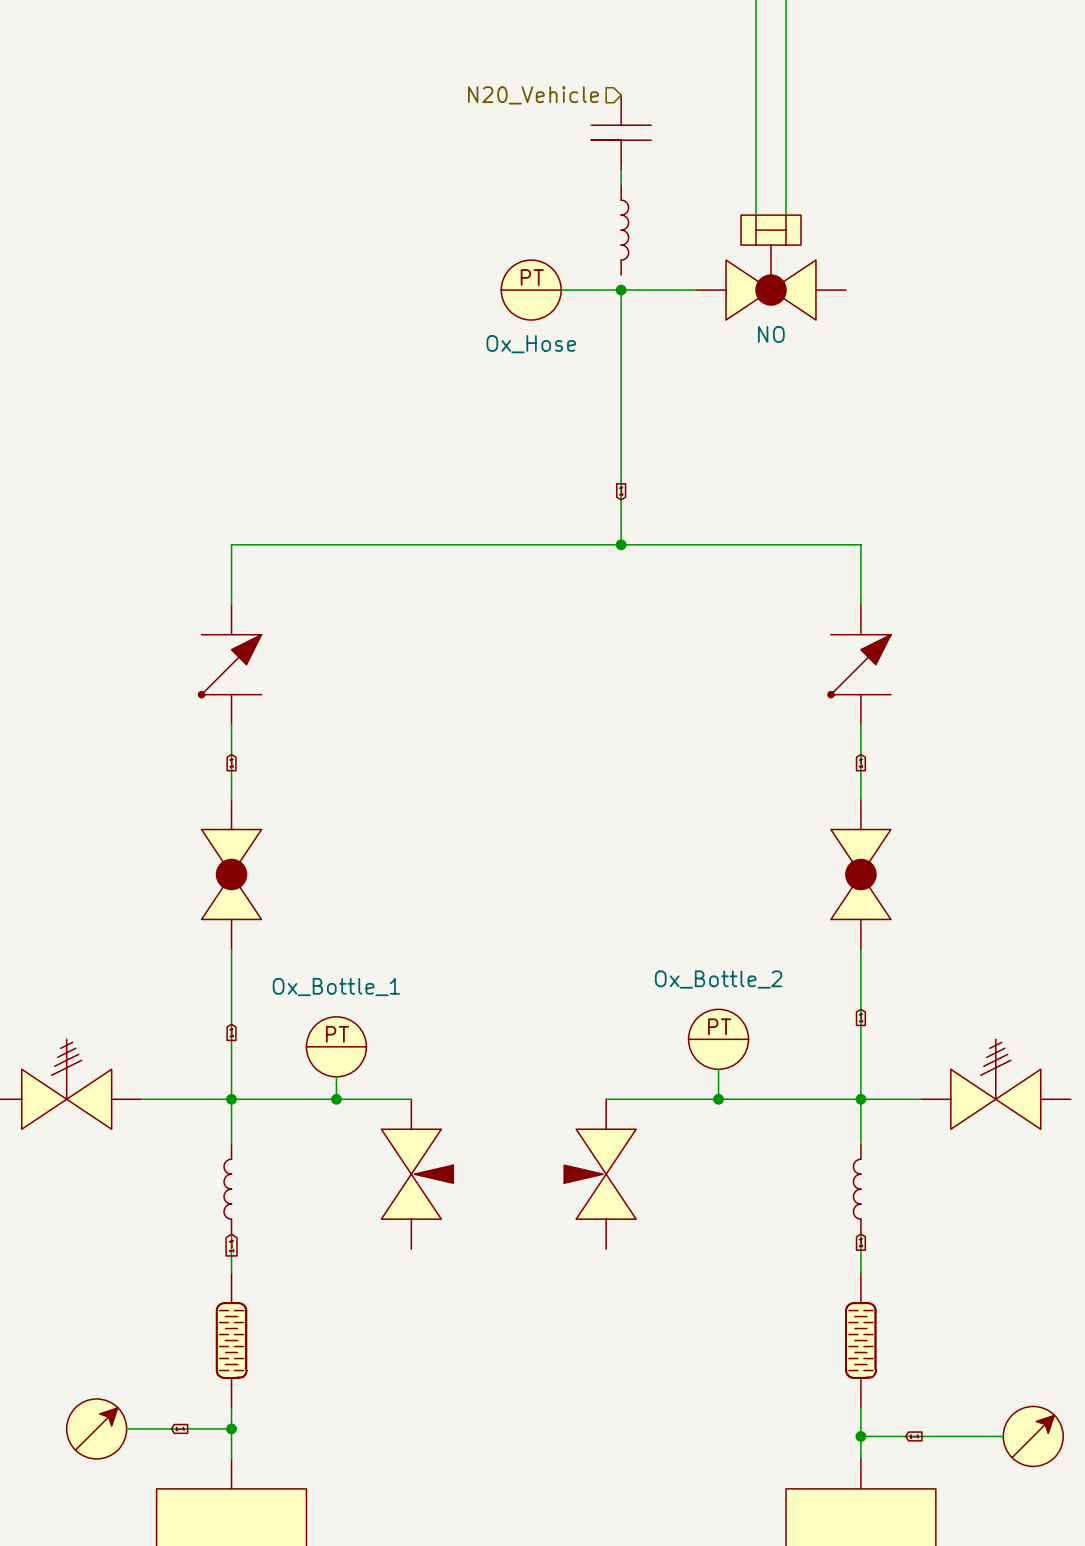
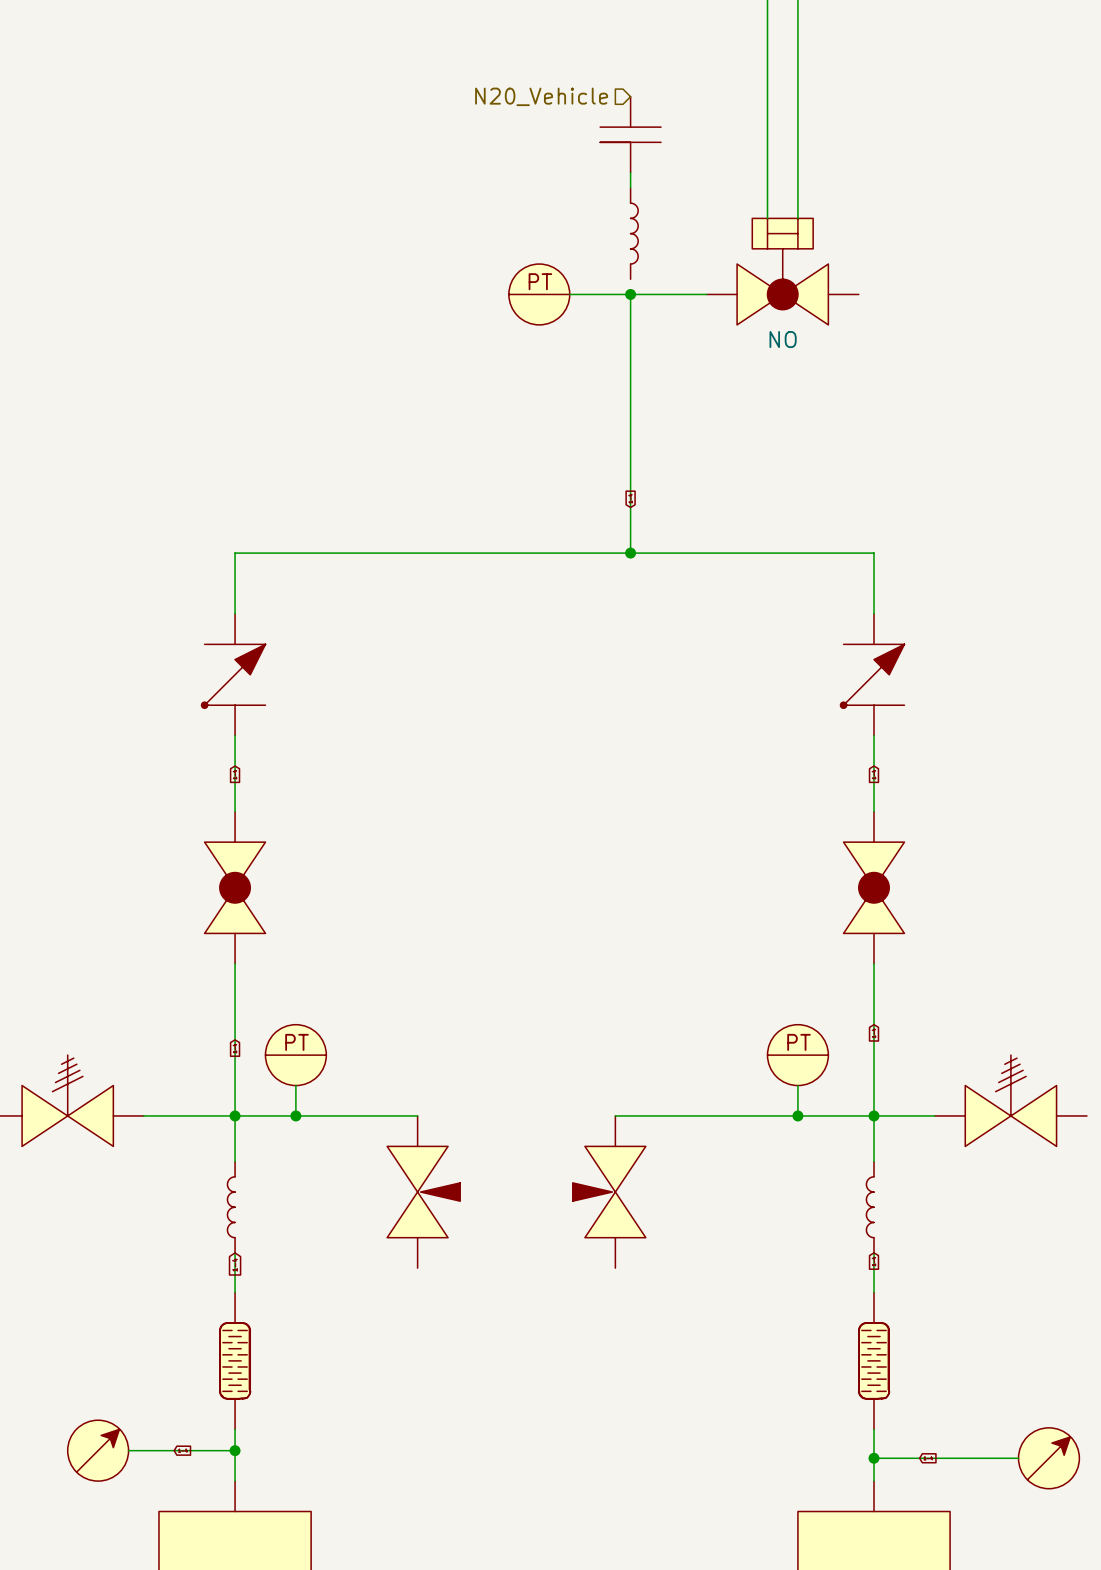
Ox_Hose name: Ox_Hose (531, 344) -> none
part: none -> (295, 1055)
Ox_Bottle_2: (718, 1039) -> none
part: none -> (797, 1055)
Ox_Bottle_1: (336, 1046) -> none
wire: none -> (295, 1085) (295, 1115)
wire: (718, 1069) (718, 1099) -> (797, 1085) (797, 1115)
wire: (336, 1076) (336, 1099) -> none
junction position: (336, 1099) -> (295, 1115)
junction position: (718, 1099) -> (797, 1115)

